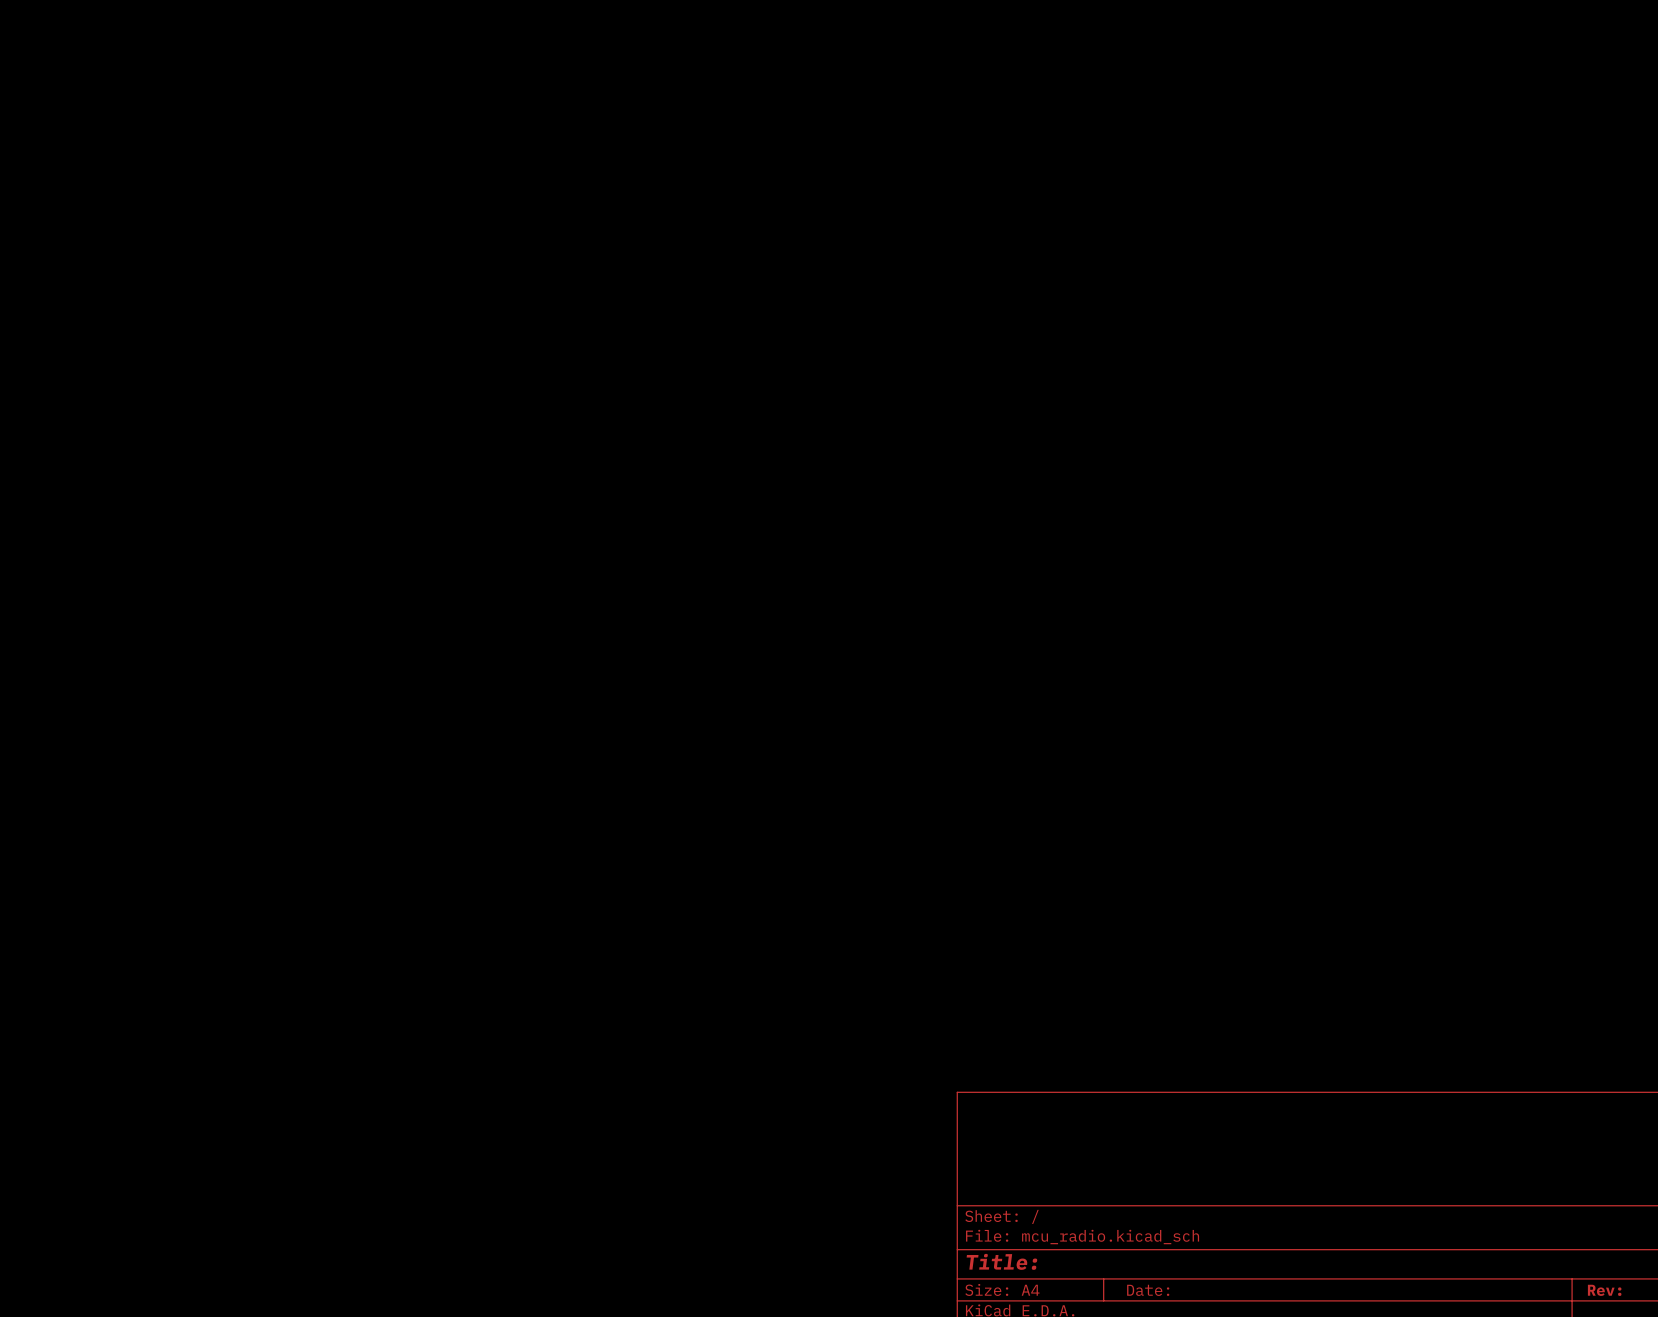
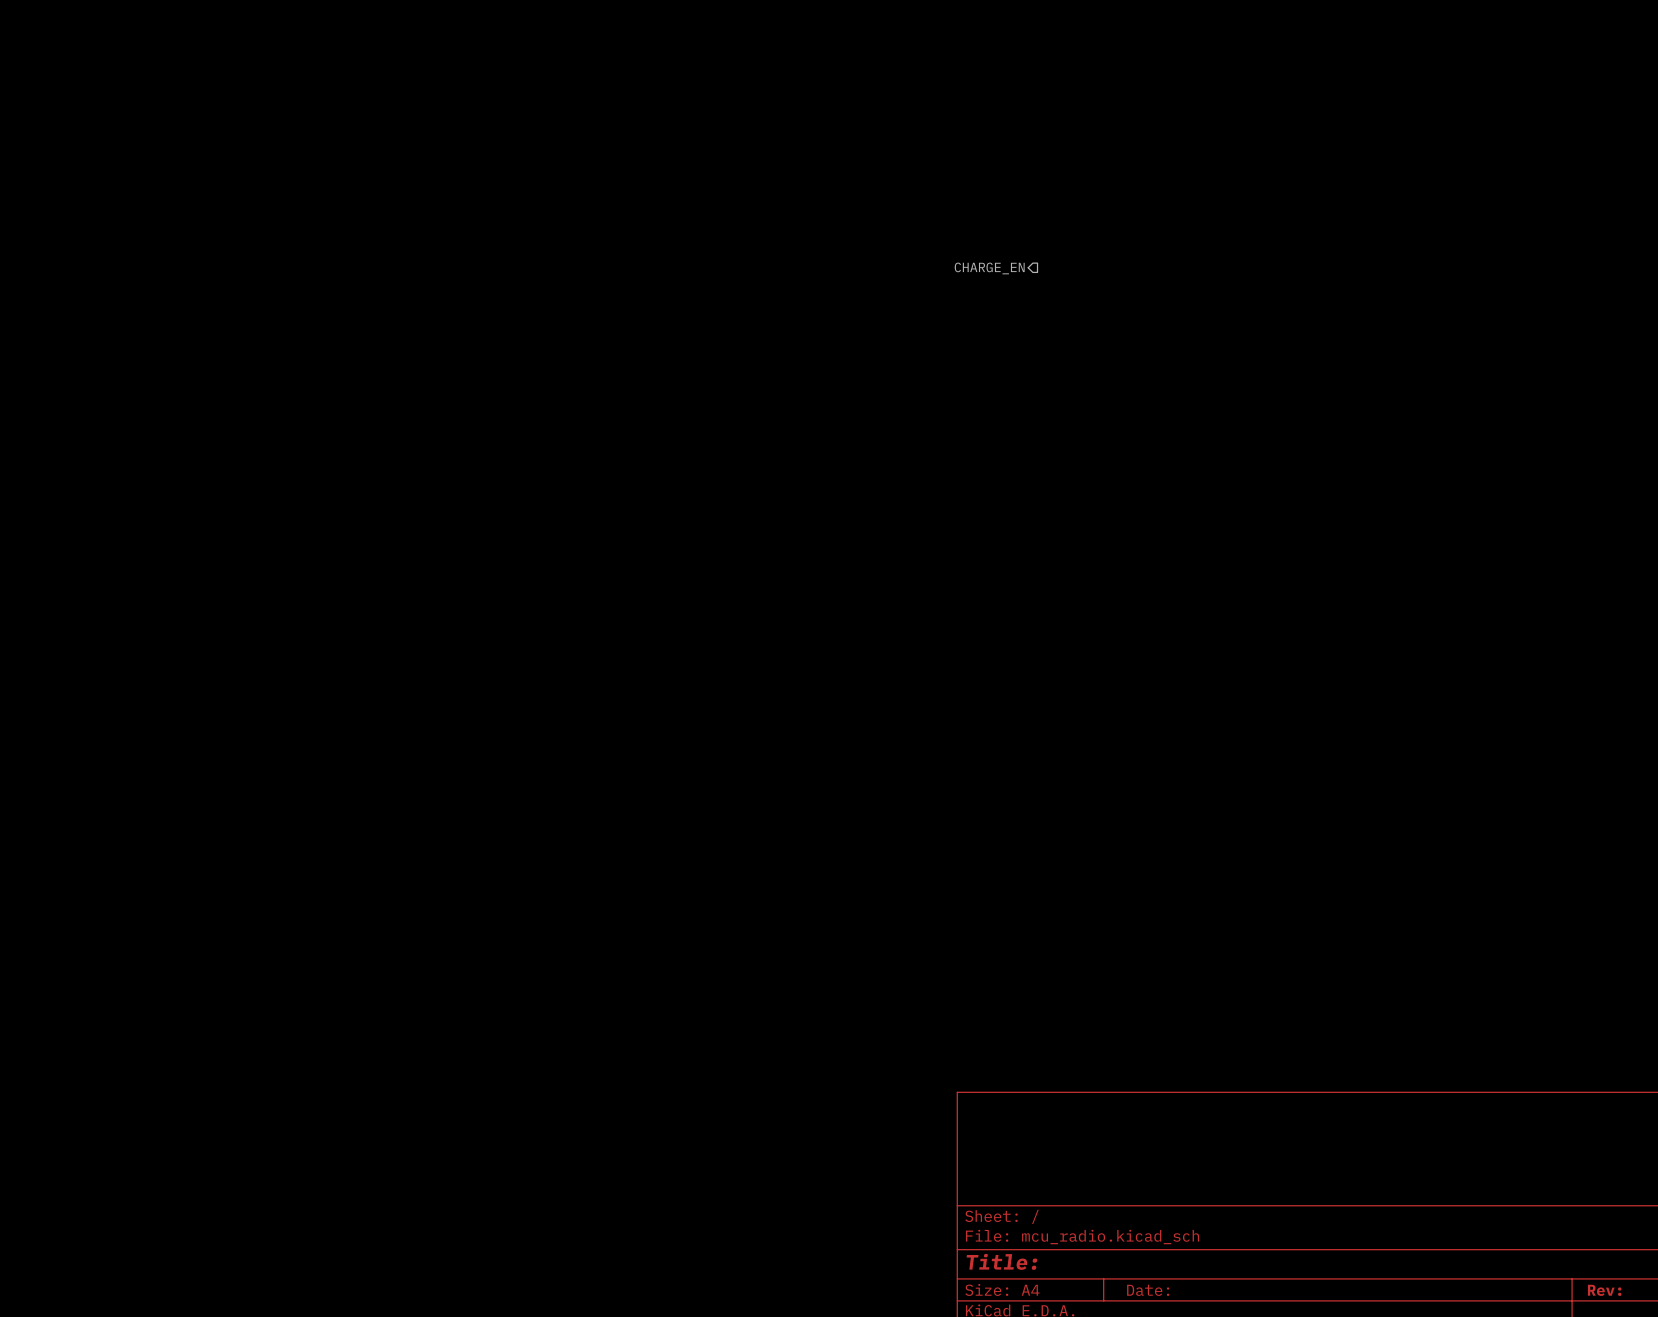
hierarchical label: none -> CHARGE_EN (989, 268)

